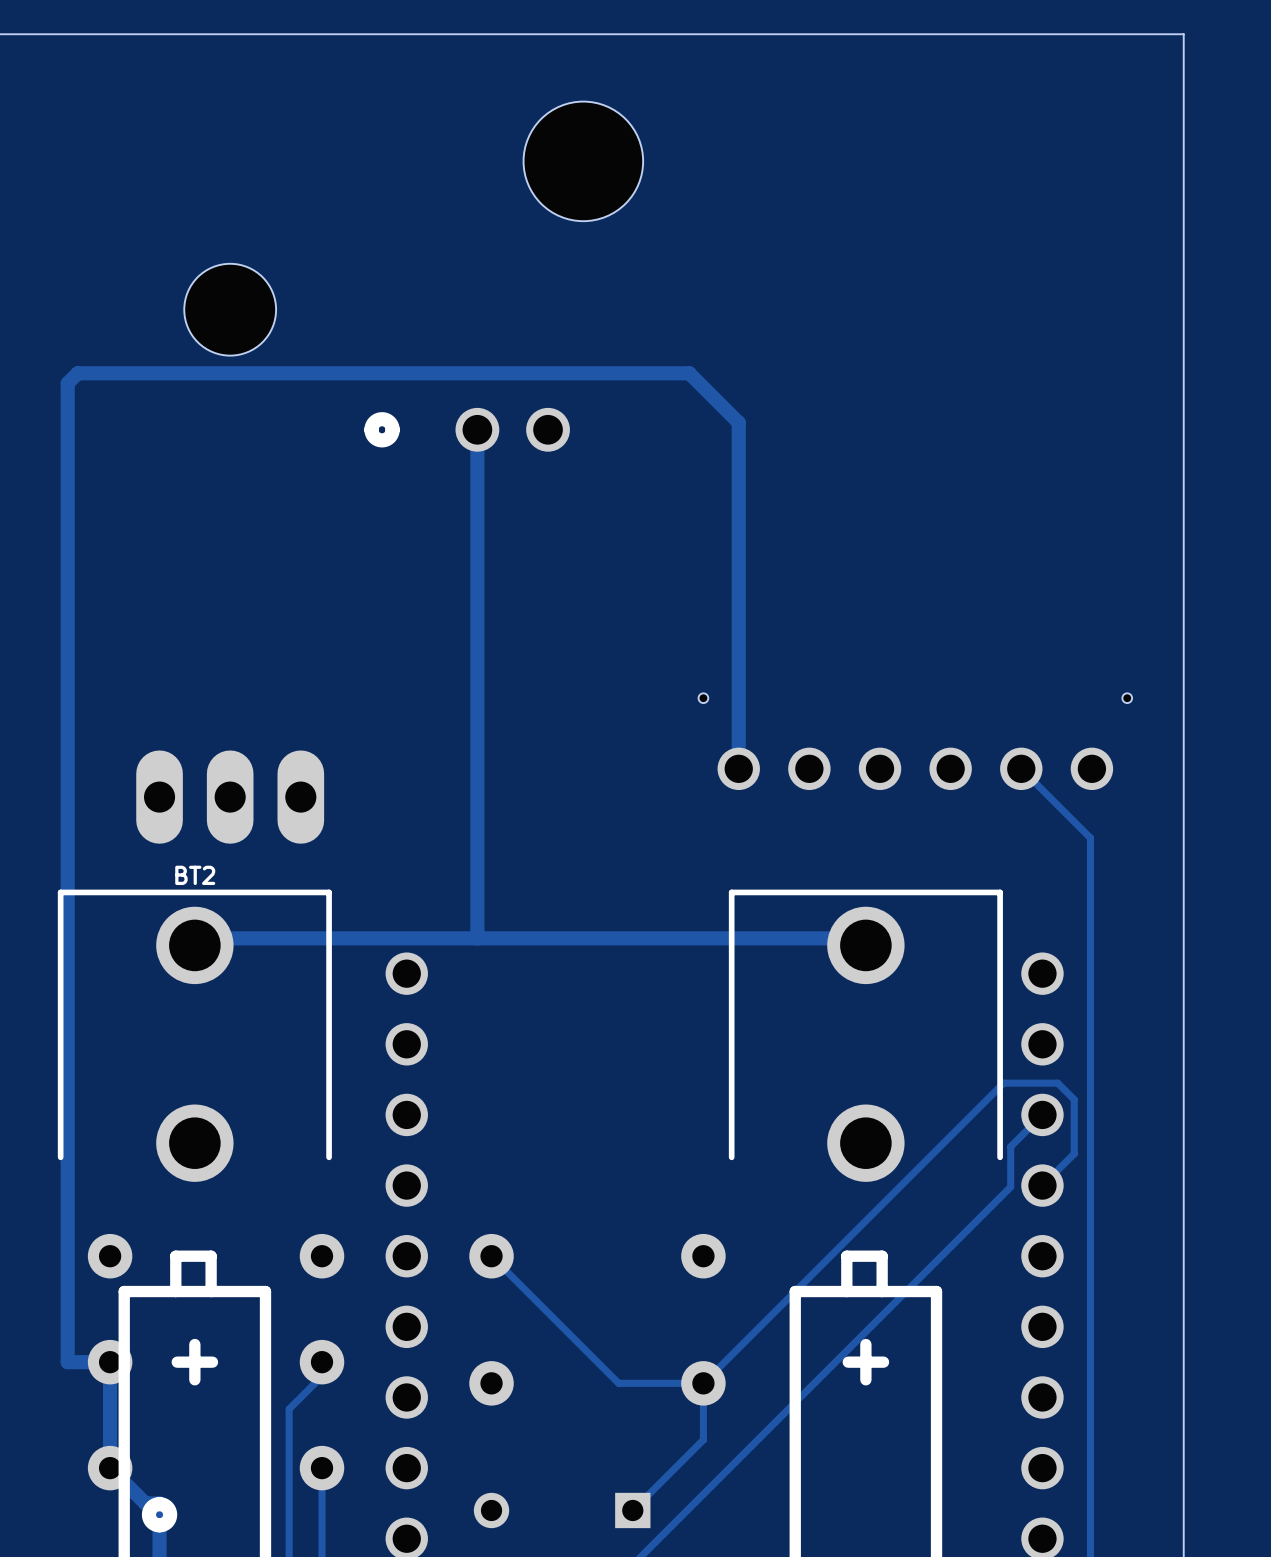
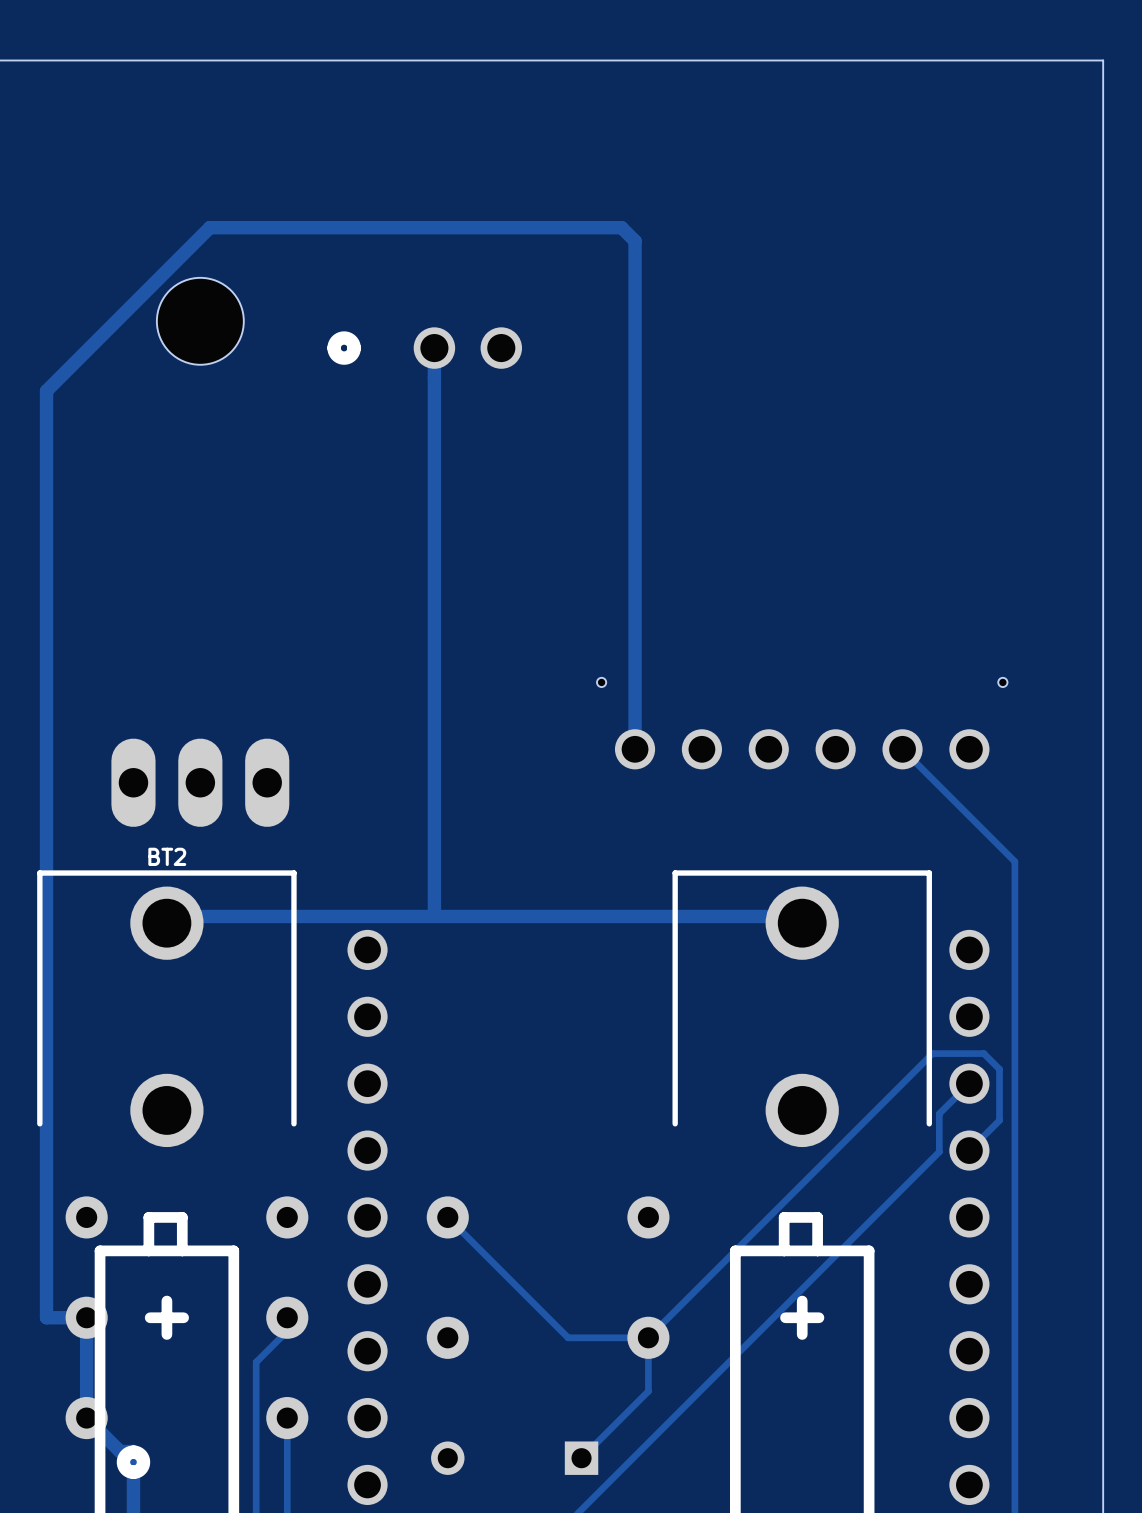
part: (583, 161) -> none
track: none -> (434, 348) (434, 434)
track: (77, 373) (689, 373) (738, 422) (738, 768) -> (56, 381) (209, 227) (621, 227) (635, 241) (635, 749)
part position: (467, 429) -> (424, 348)
part position: (915, 741) -> (802, 723)
track: (1021, 768) (1090, 838) (1090, 880) -> (902, 749) (1014, 861)

